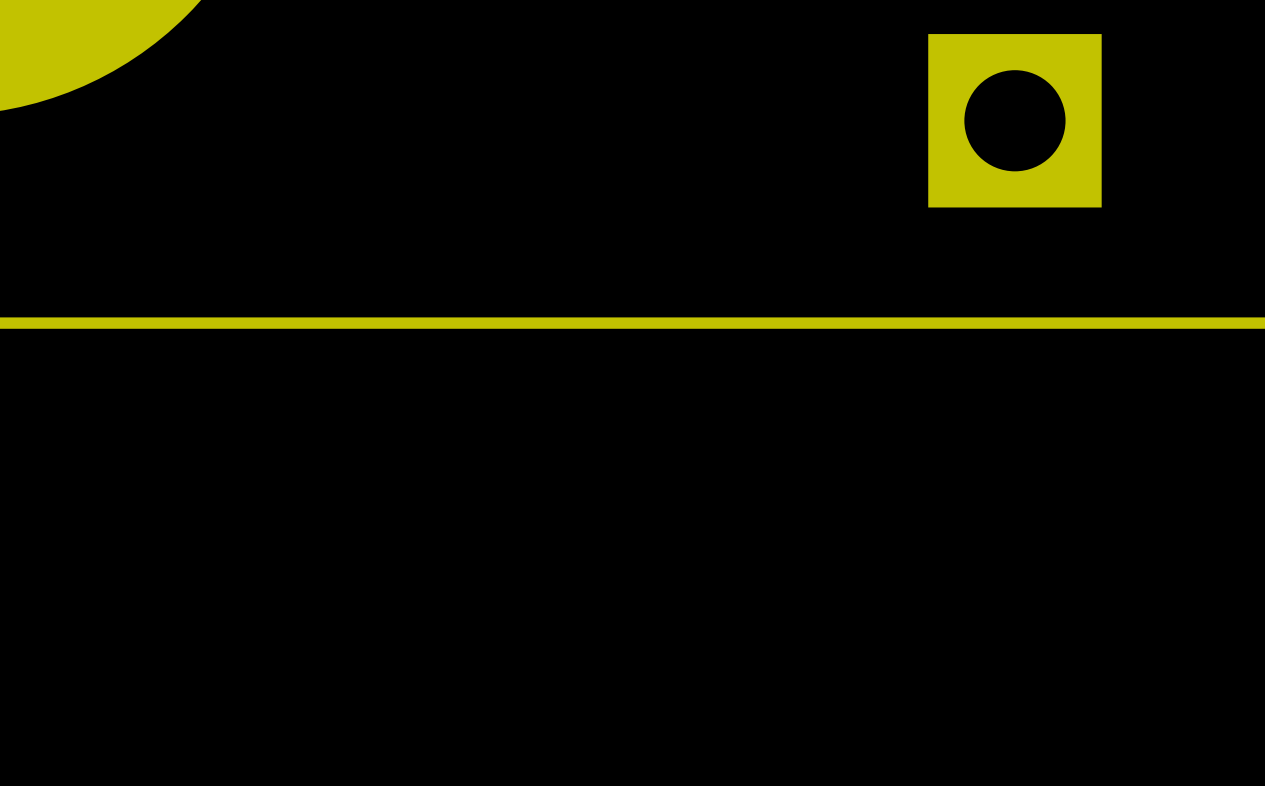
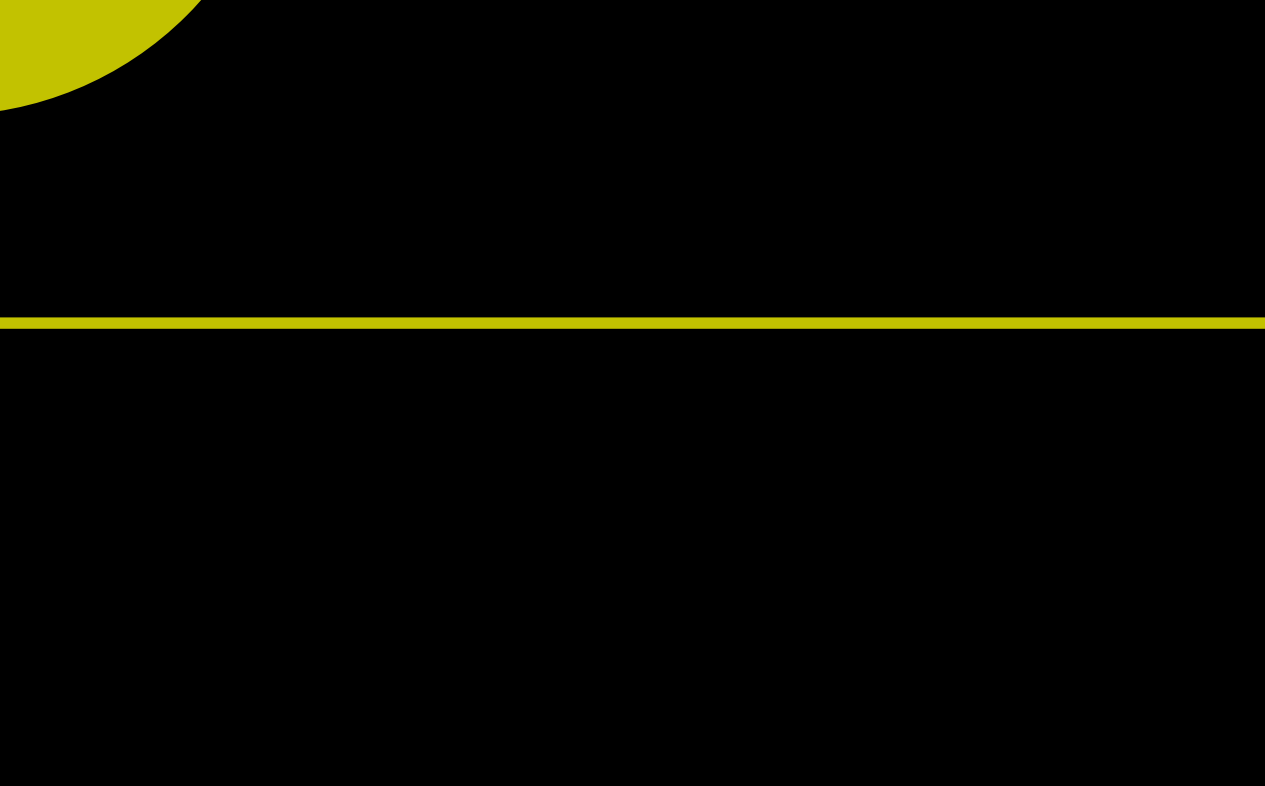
part: (1014, 120) -> none

